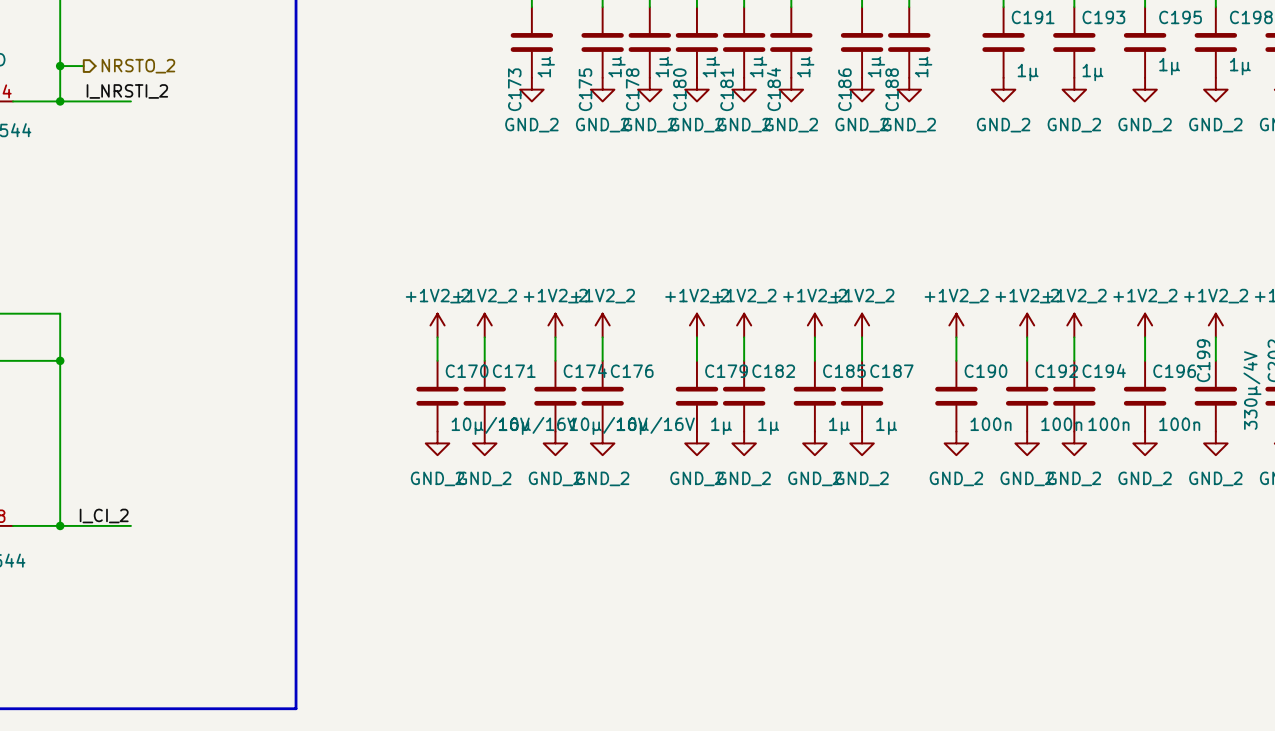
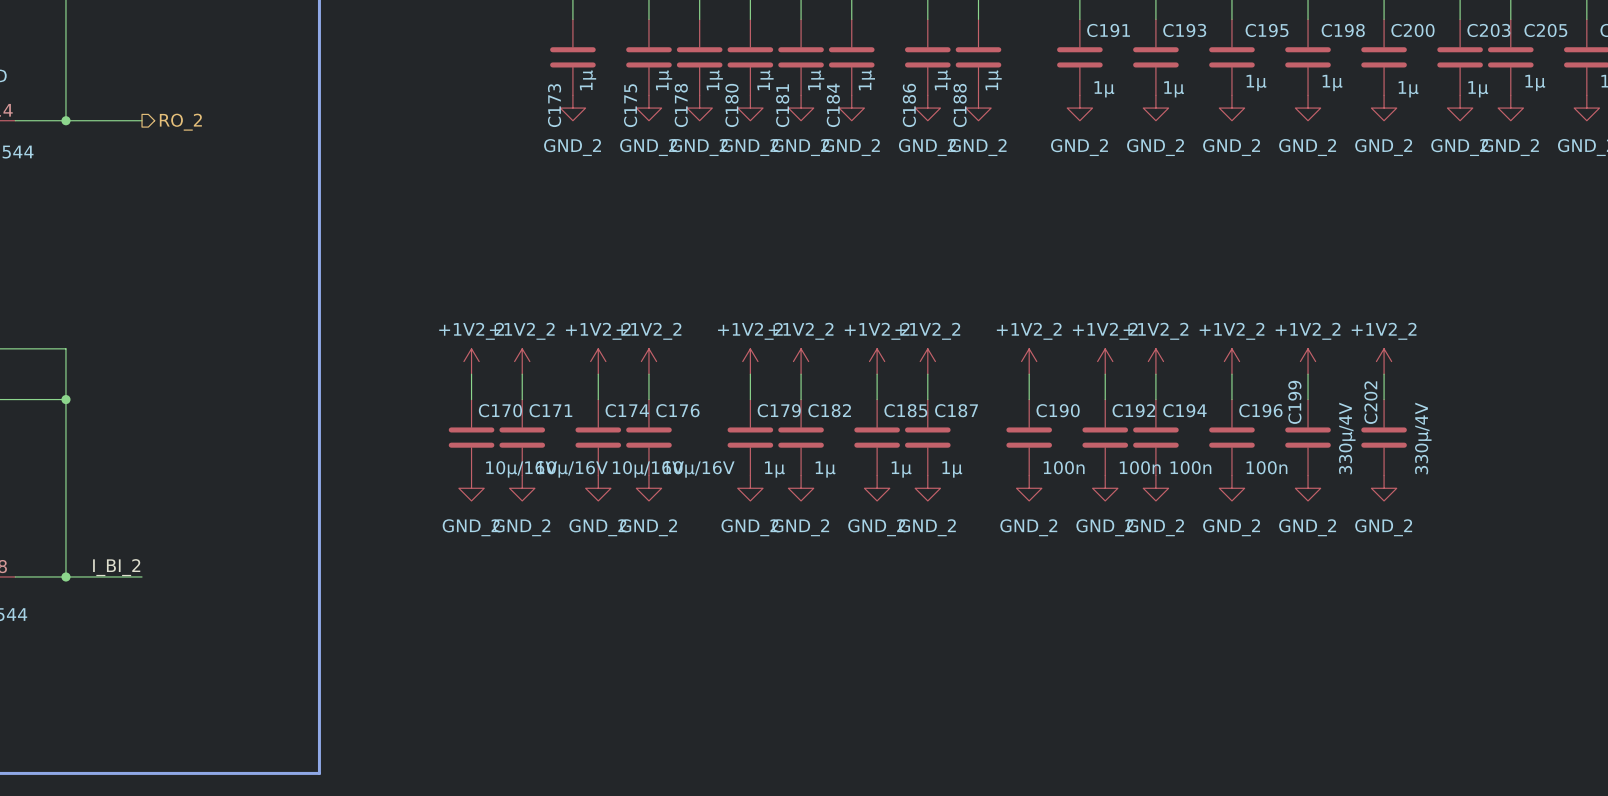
wire: (60, 66) (83, 66) -> none
junction: (60, 66) -> none
hierarchical label: NRSTO_2 (138, 66) -> none
label: I_NRSTI_2 (127, 91) -> none
hierarchical label: none -> RO_2 (180, 122)
label: I_CI_2 (104, 515) -> I_BI_2 (116, 567)

